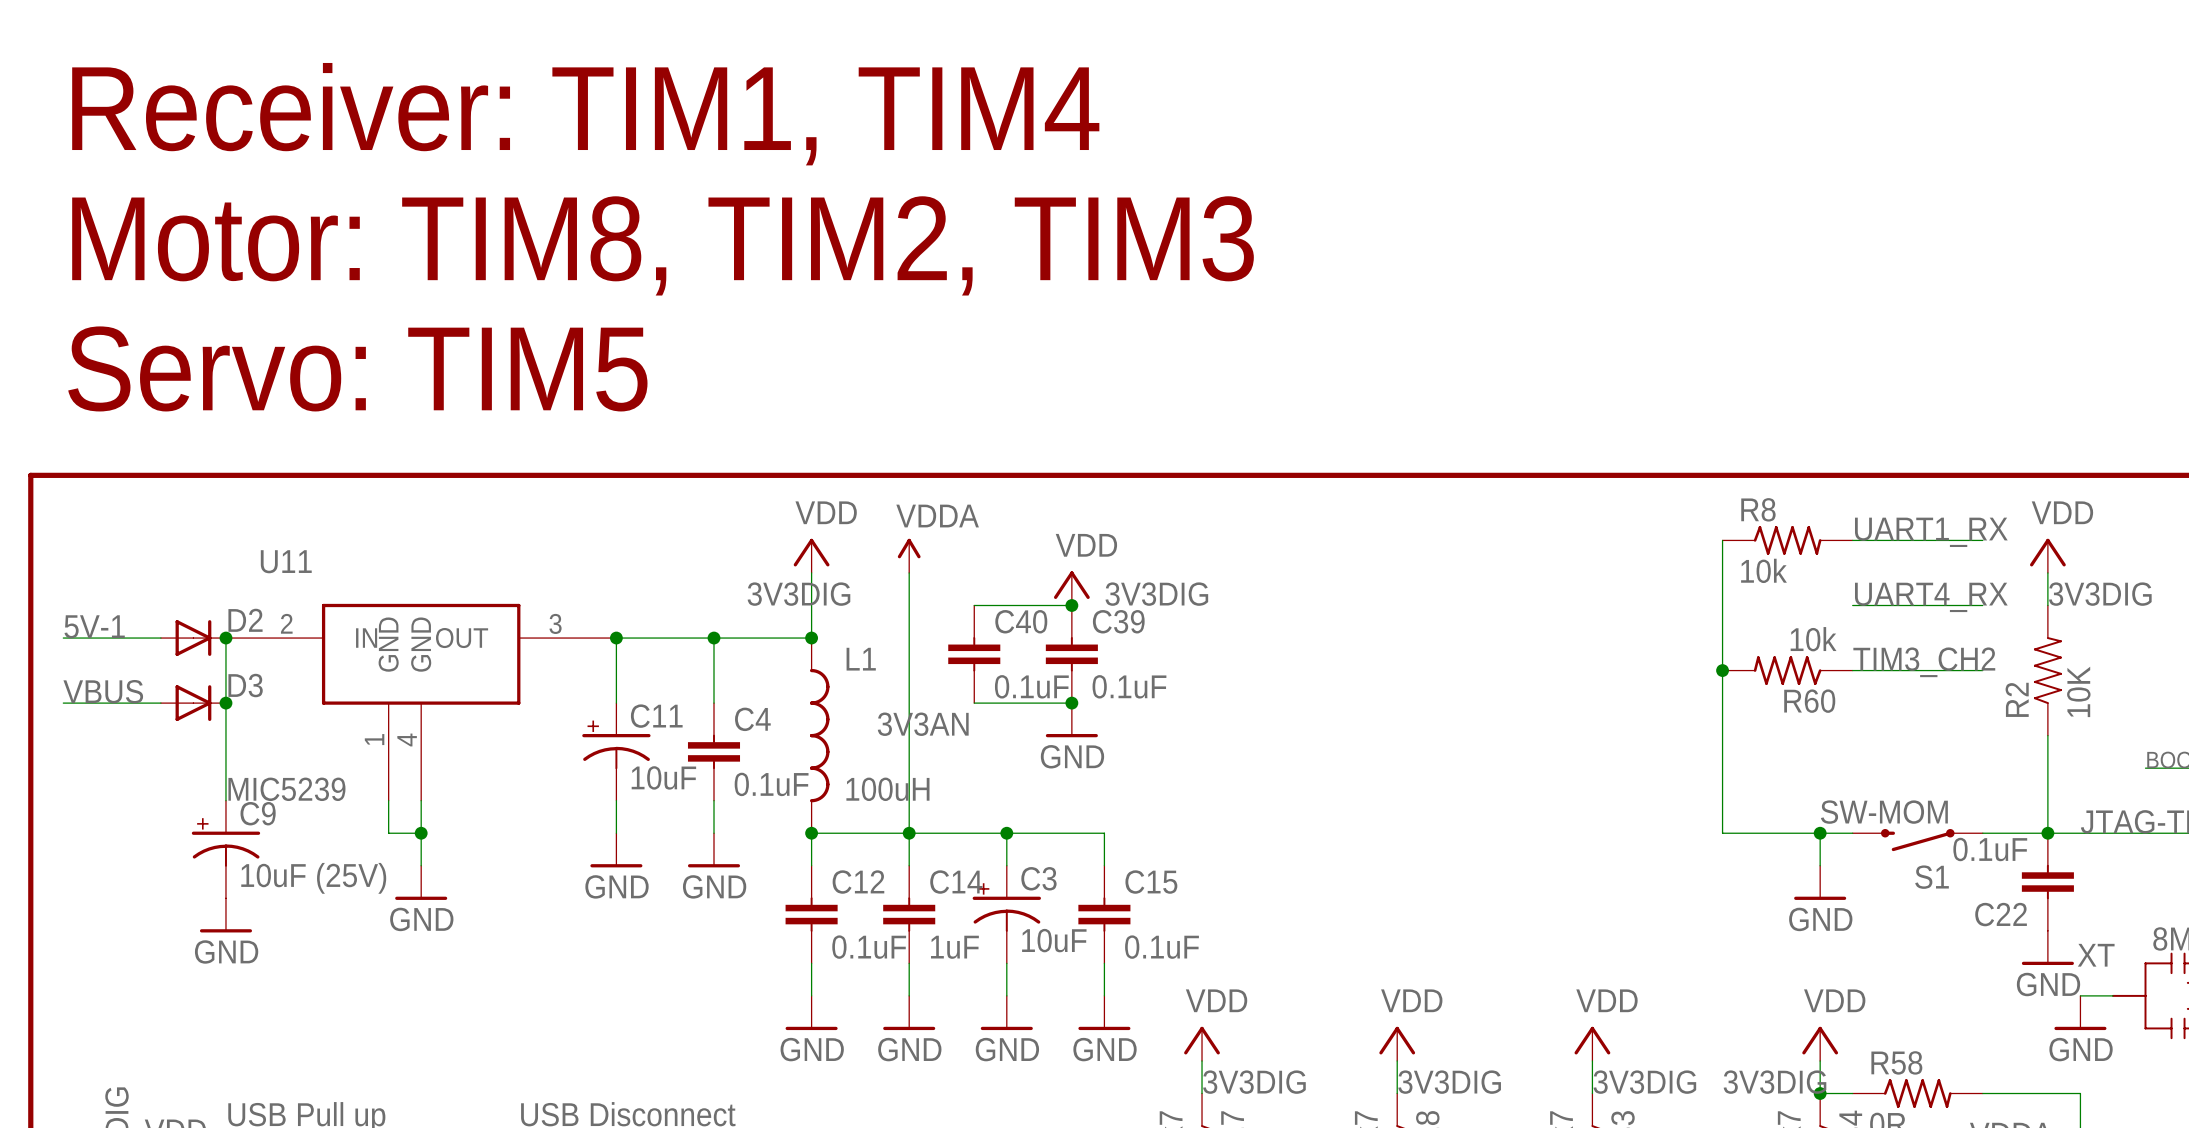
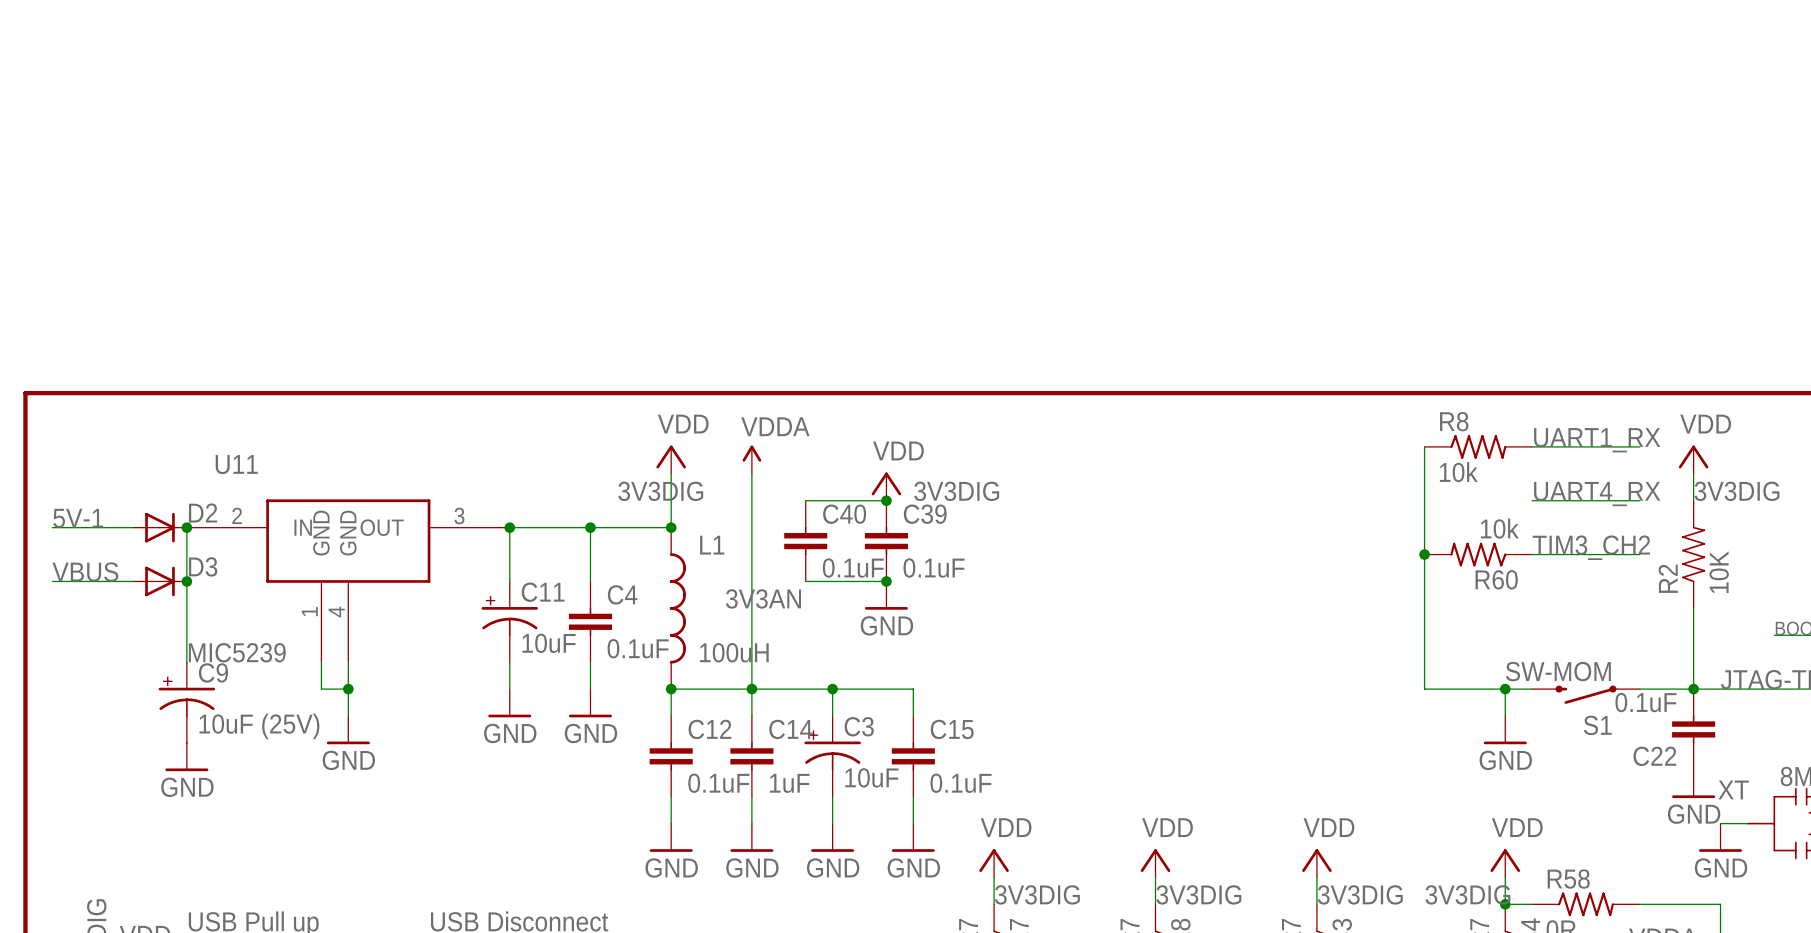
text: Receiver: TIM1, TIM4 (585, 114) -> none
text: Motor: TIM8, TIM2, TIM3 (663, 245) -> none
text: Servo: TIM5 (357, 368) -> none

